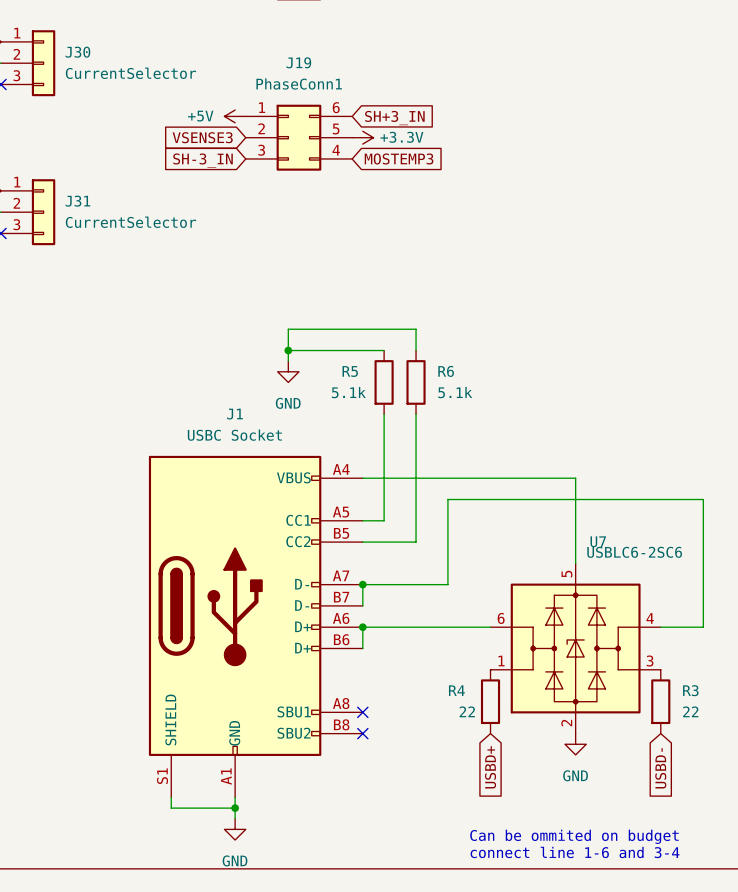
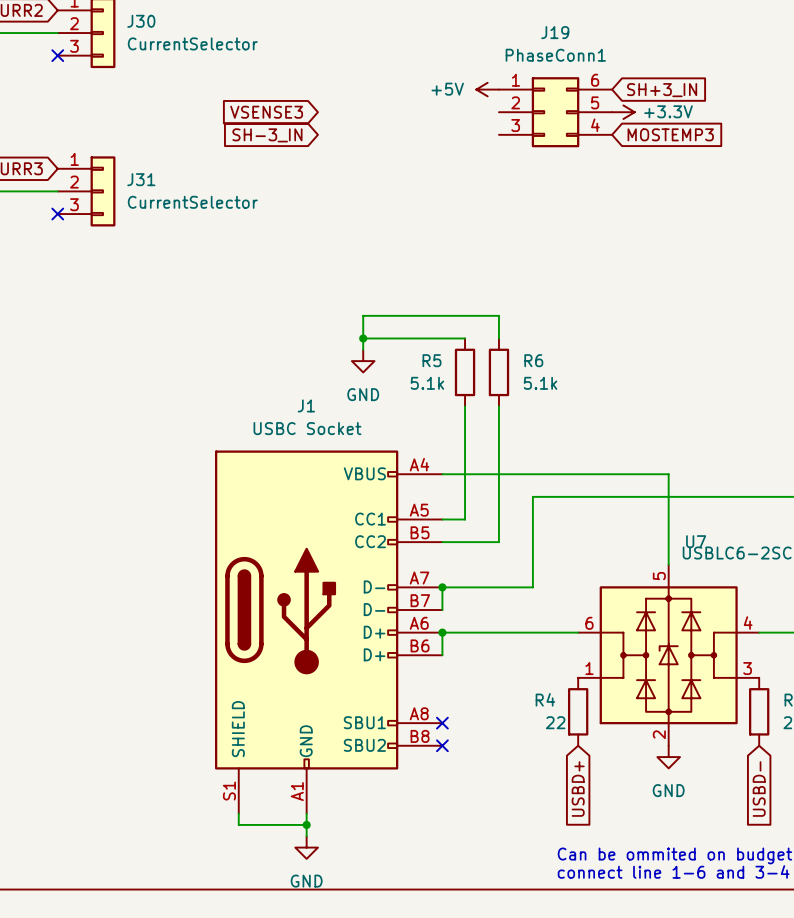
power symbol position: +5V (235, 116) -> +5V (487, 89)
global label position: SH+3_IN (394, 118) -> SH+3_IN (662, 90)
J19 position: (298, 137) -> (555, 112)
power symbol position: +3.3V (362, 137) -> +3.3V (623, 112)
global label position: MOSTEMP3 (399, 158) -> MOSTEMP3 (670, 134)

